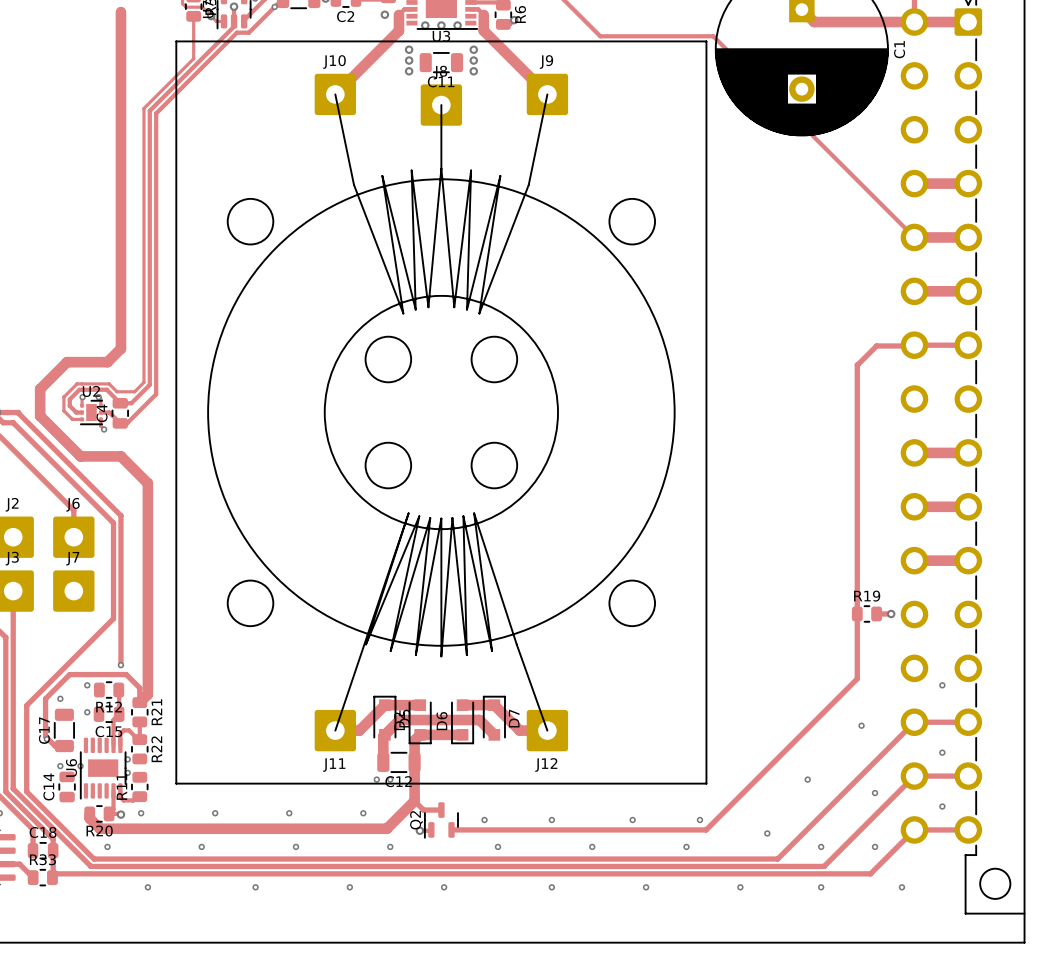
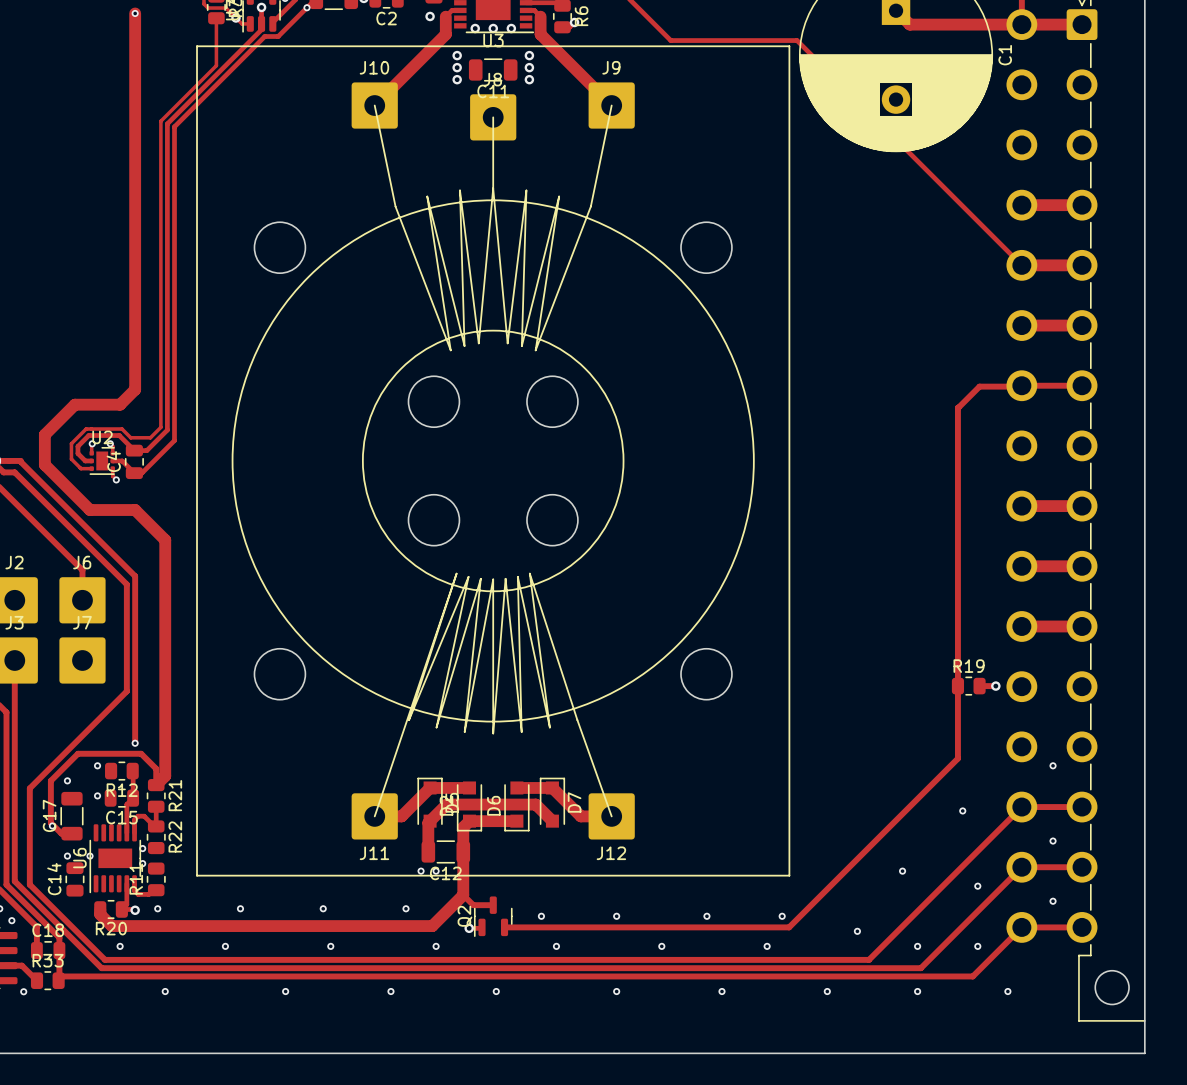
via: none -> (135, 13)
via: none -> (11, 920)
via: none -> (23, 991)

